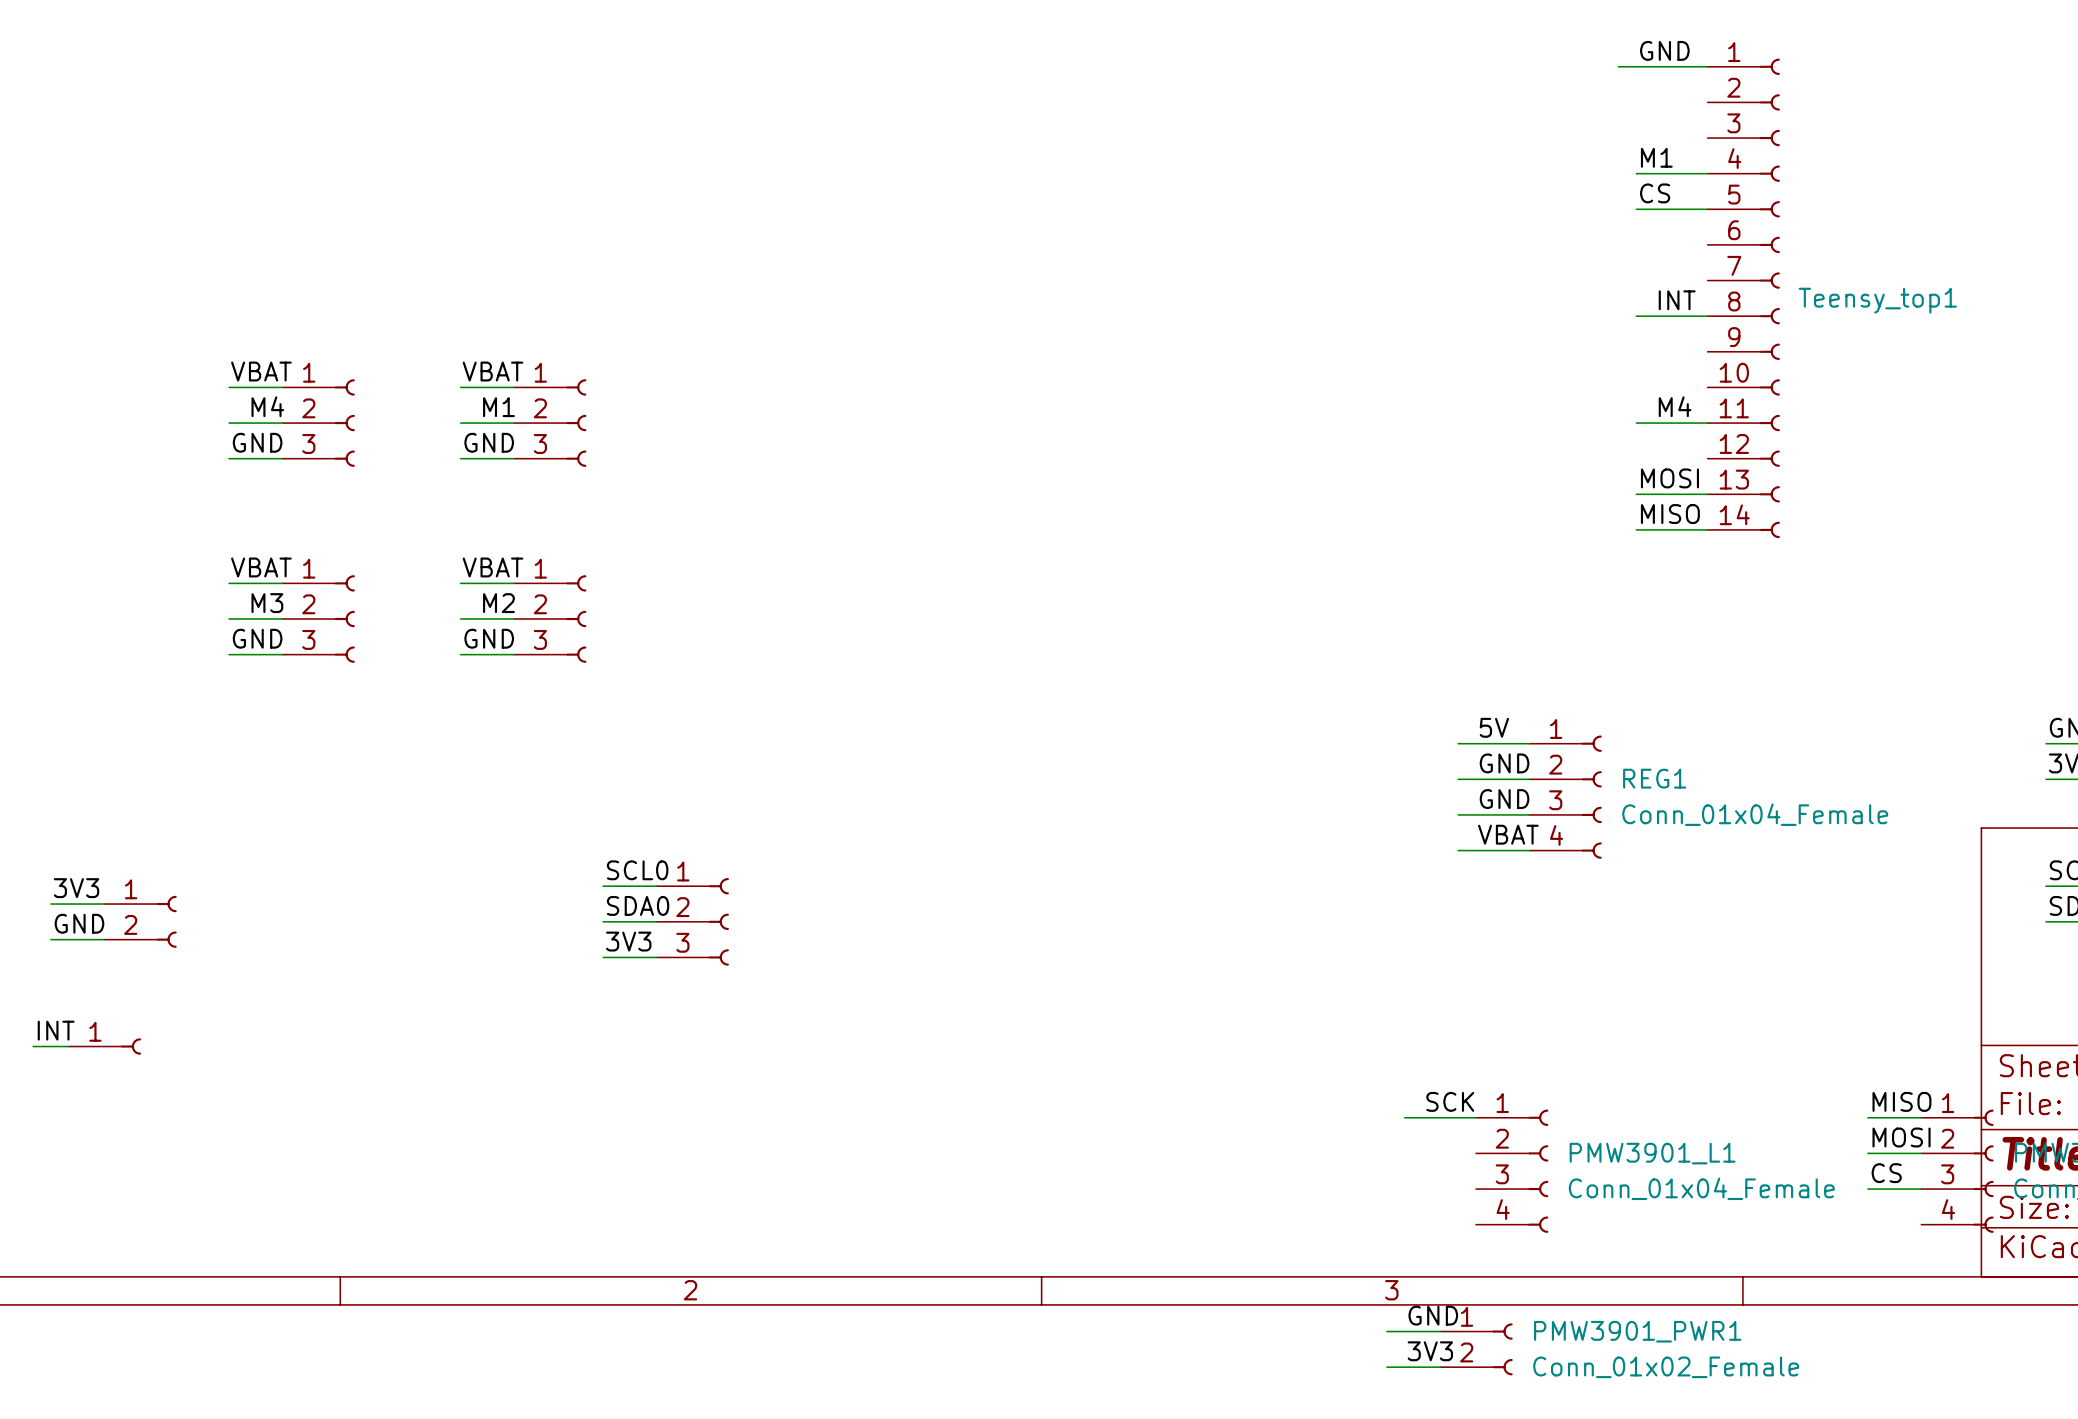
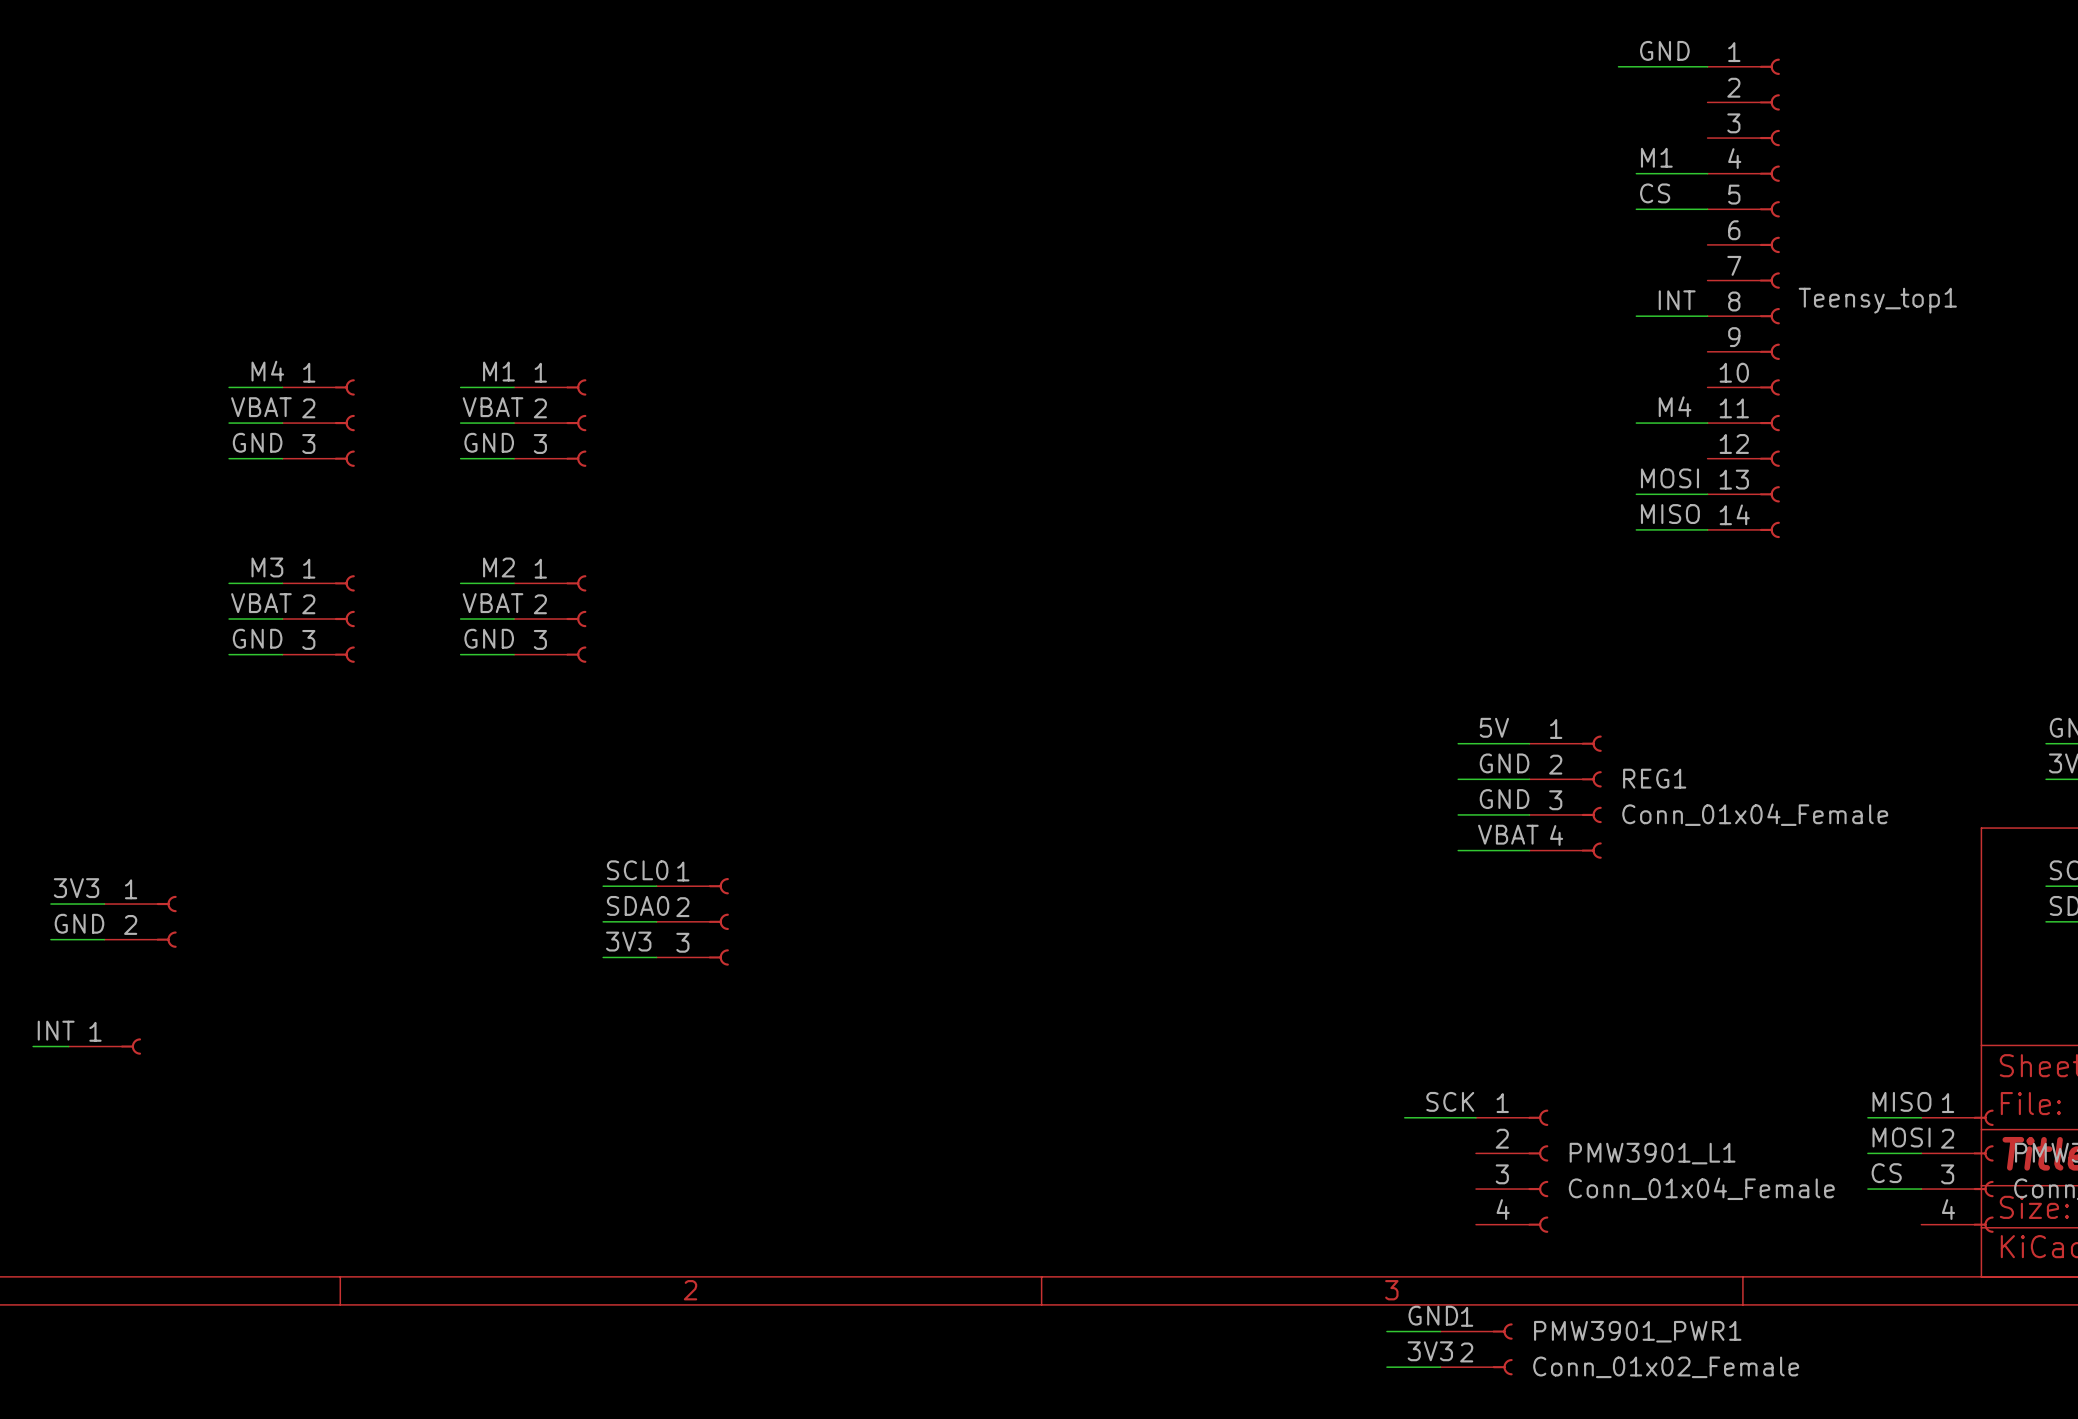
label position: VBAT (261, 371) -> VBAT (261, 407)
label position: VBAT (493, 371) -> VBAT (493, 407)
label position: M4 (267, 406) -> M4 (267, 371)
label position: M1 (498, 407) -> M1 (498, 371)
label position: VBAT (261, 567) -> VBAT (261, 603)
label position: VBAT (493, 567) -> VBAT (493, 603)
label position: M3 (267, 603) -> M3 (267, 567)
label position: M2 (498, 603) -> M2 (498, 567)

